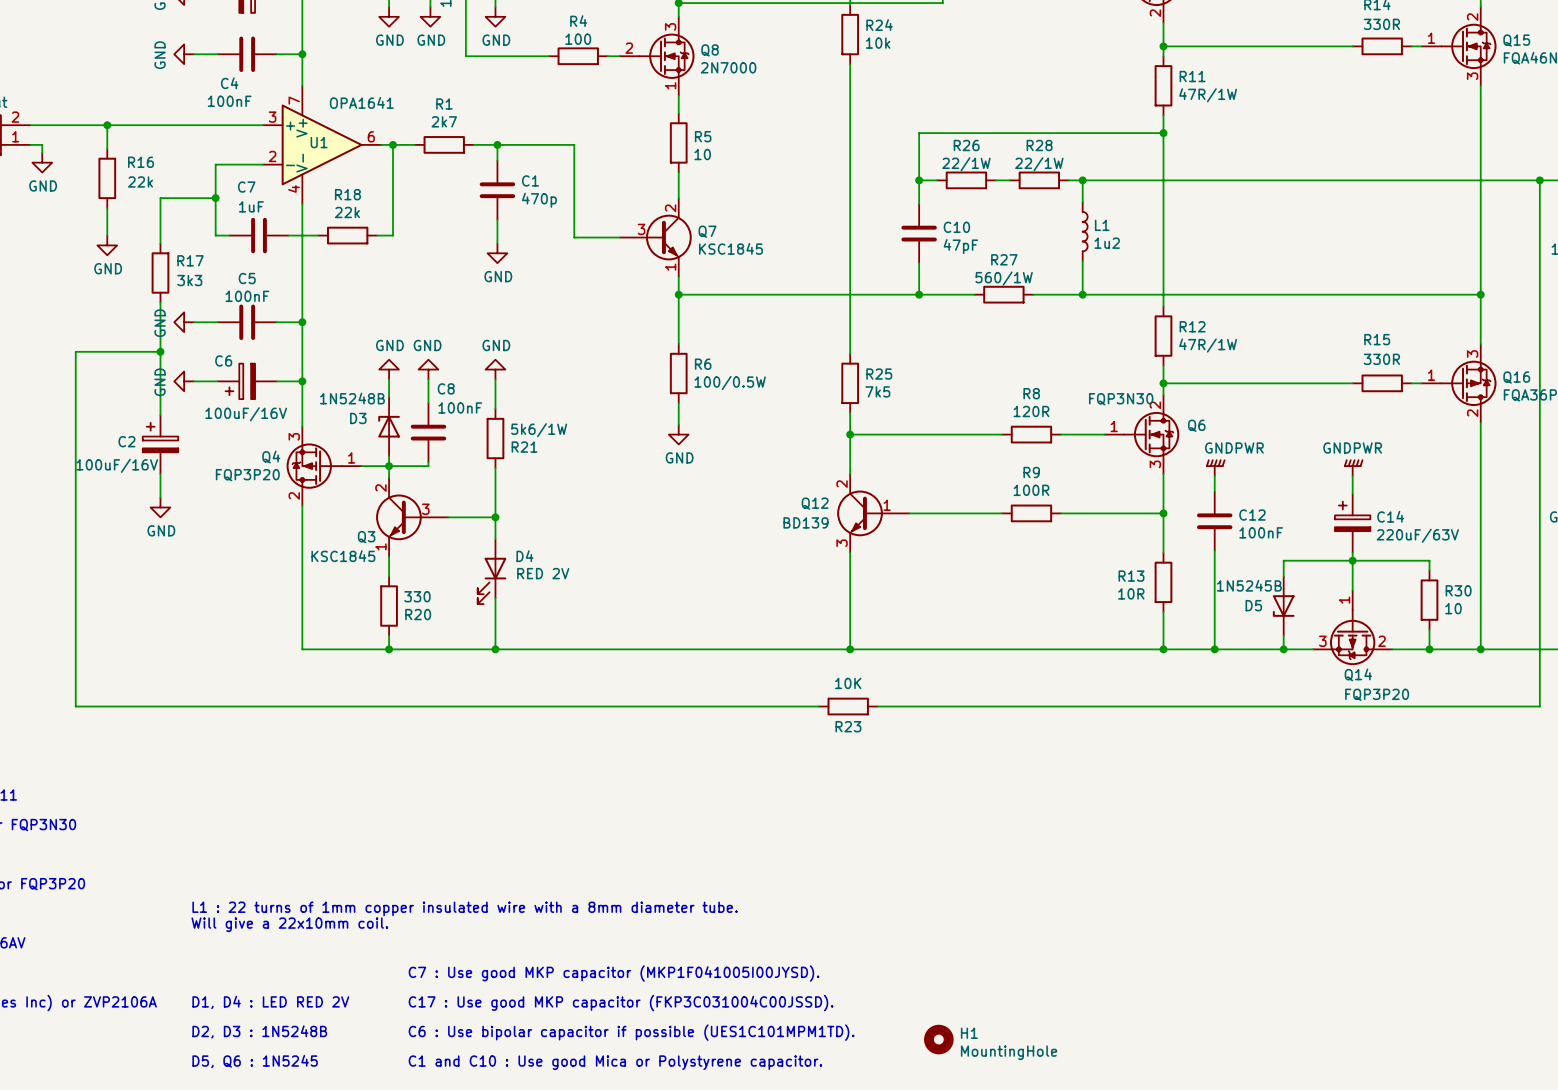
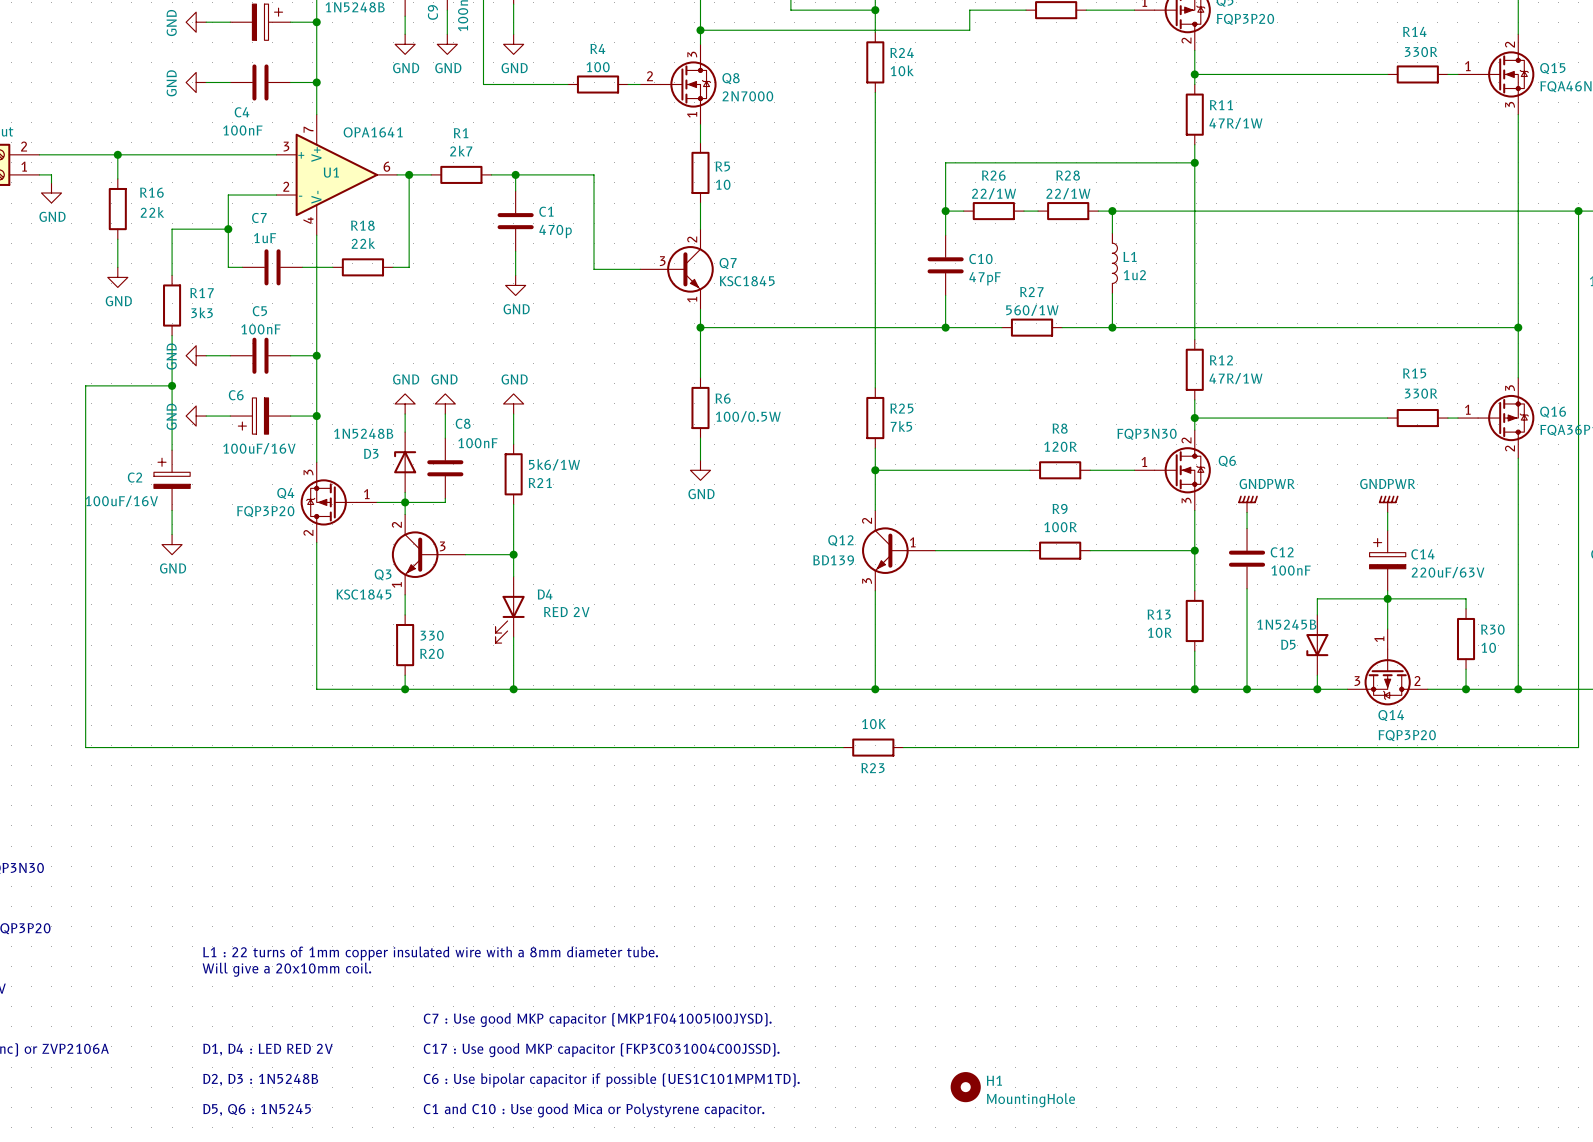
text: Will give a 22x10mm coil. (289, 924) -> Will give a 20x10mm coil. (286, 969)

